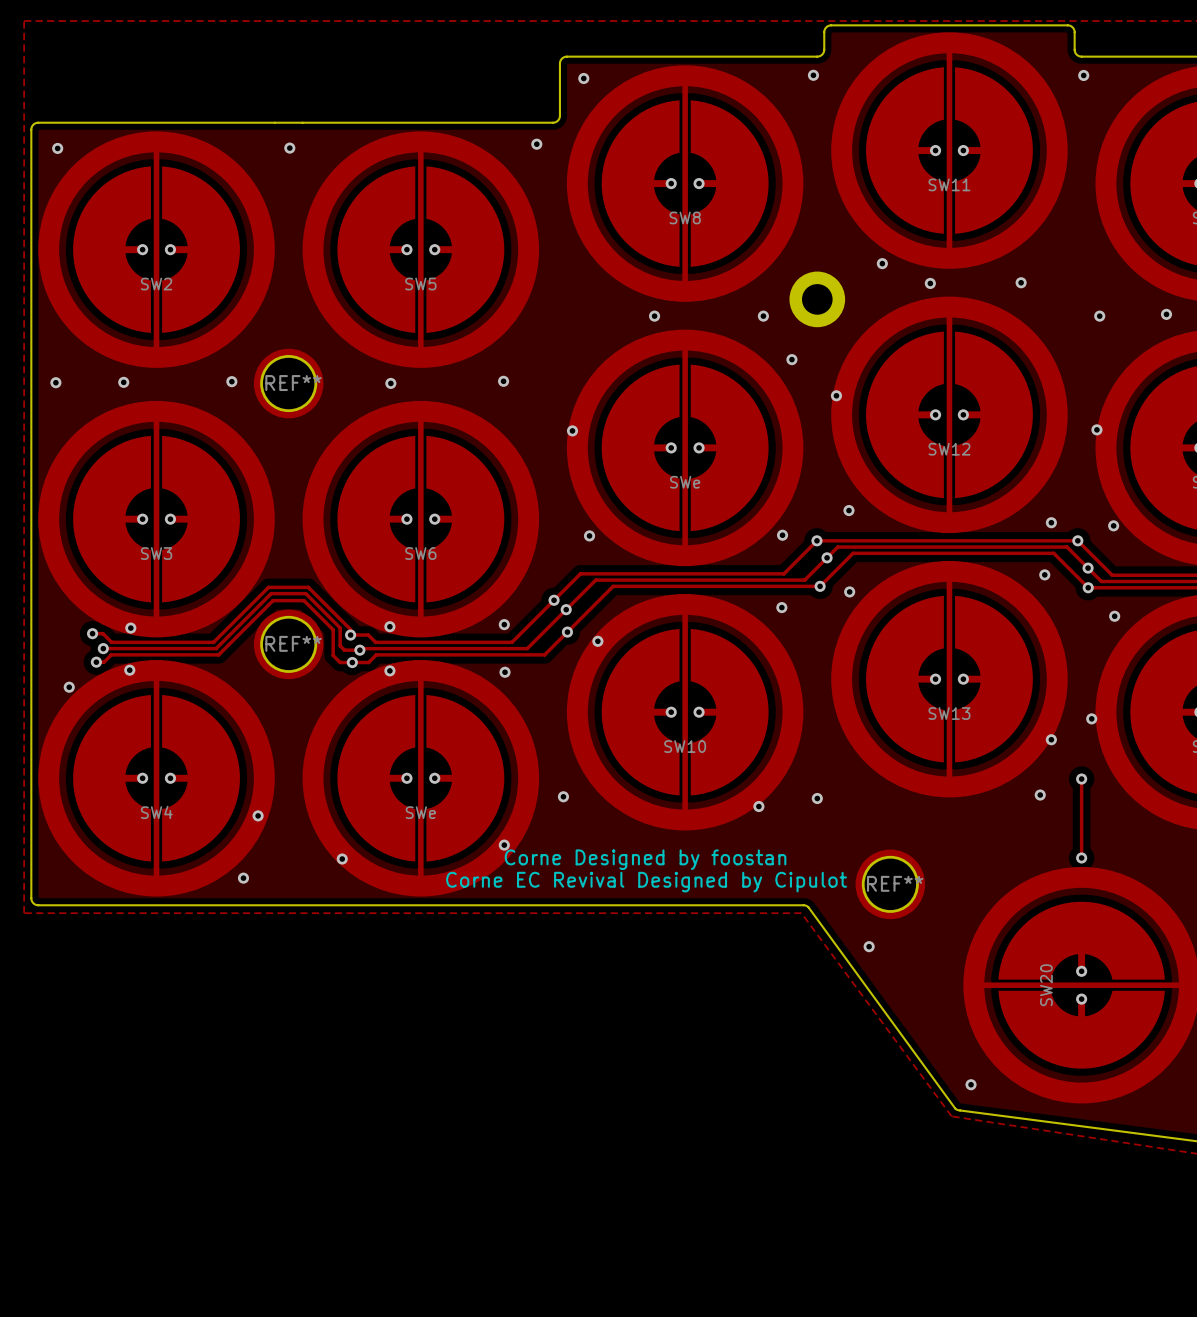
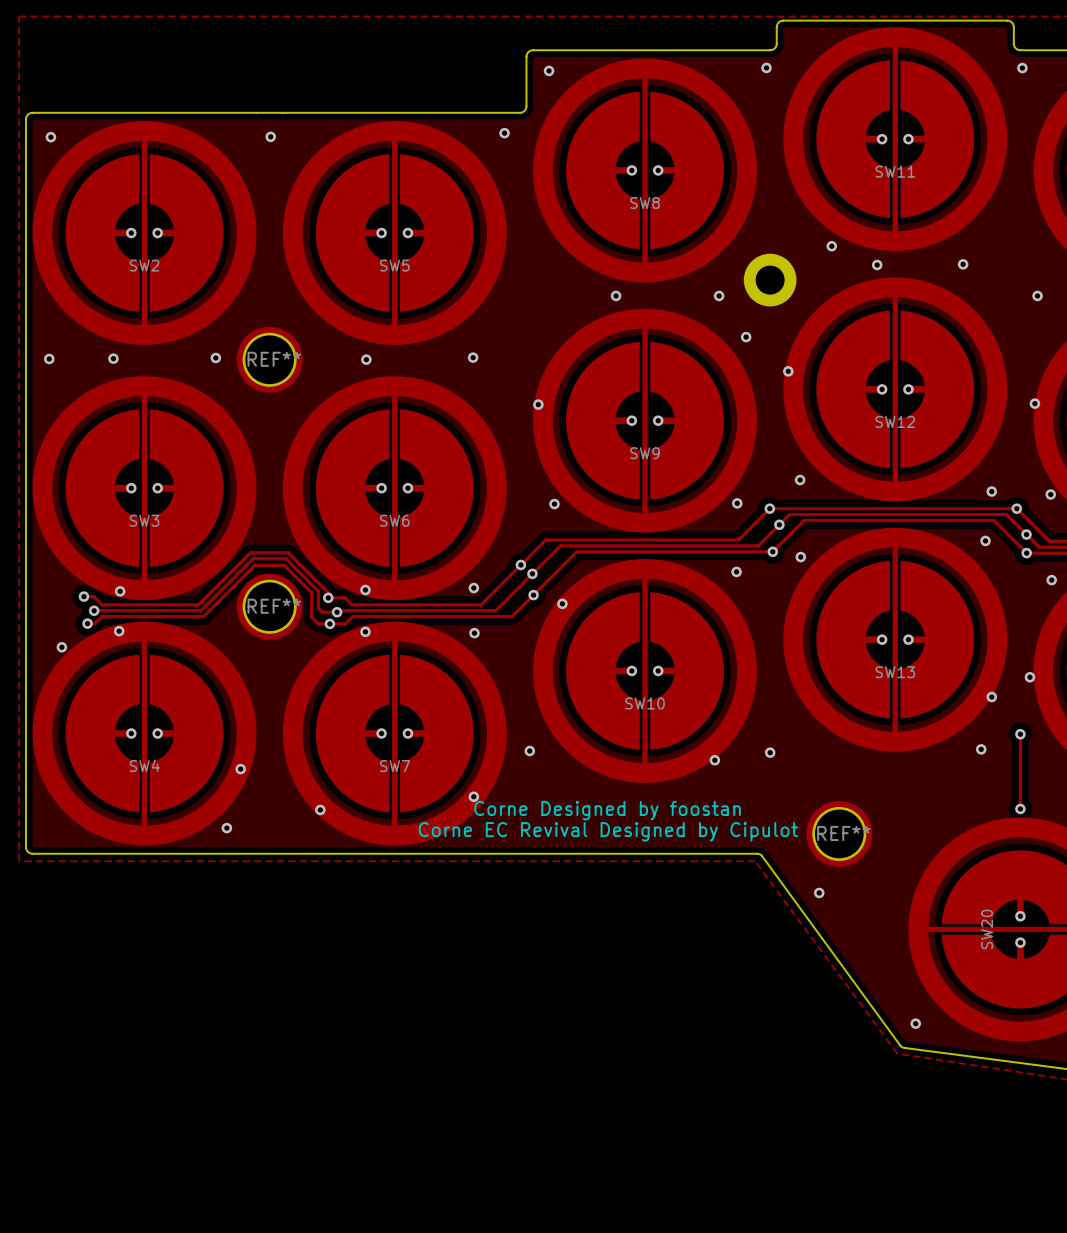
SWe name: SWe (685, 482) -> SW9 (645, 453)
SWe name: SWe (420, 812) -> SW7 (395, 766)

